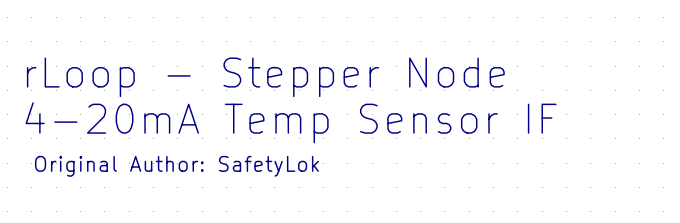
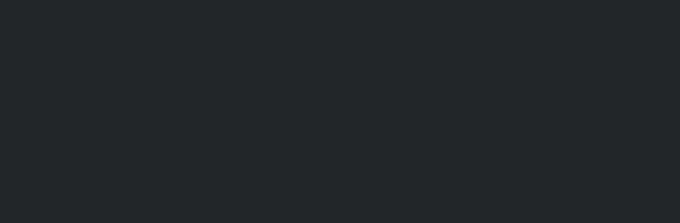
text: rLoop - Stepper Node (265, 77) -> none
text: 4-20mA Temp Sensor IF (291, 122) -> none
text: Original Author: SafetyLok (176, 166) -> none

